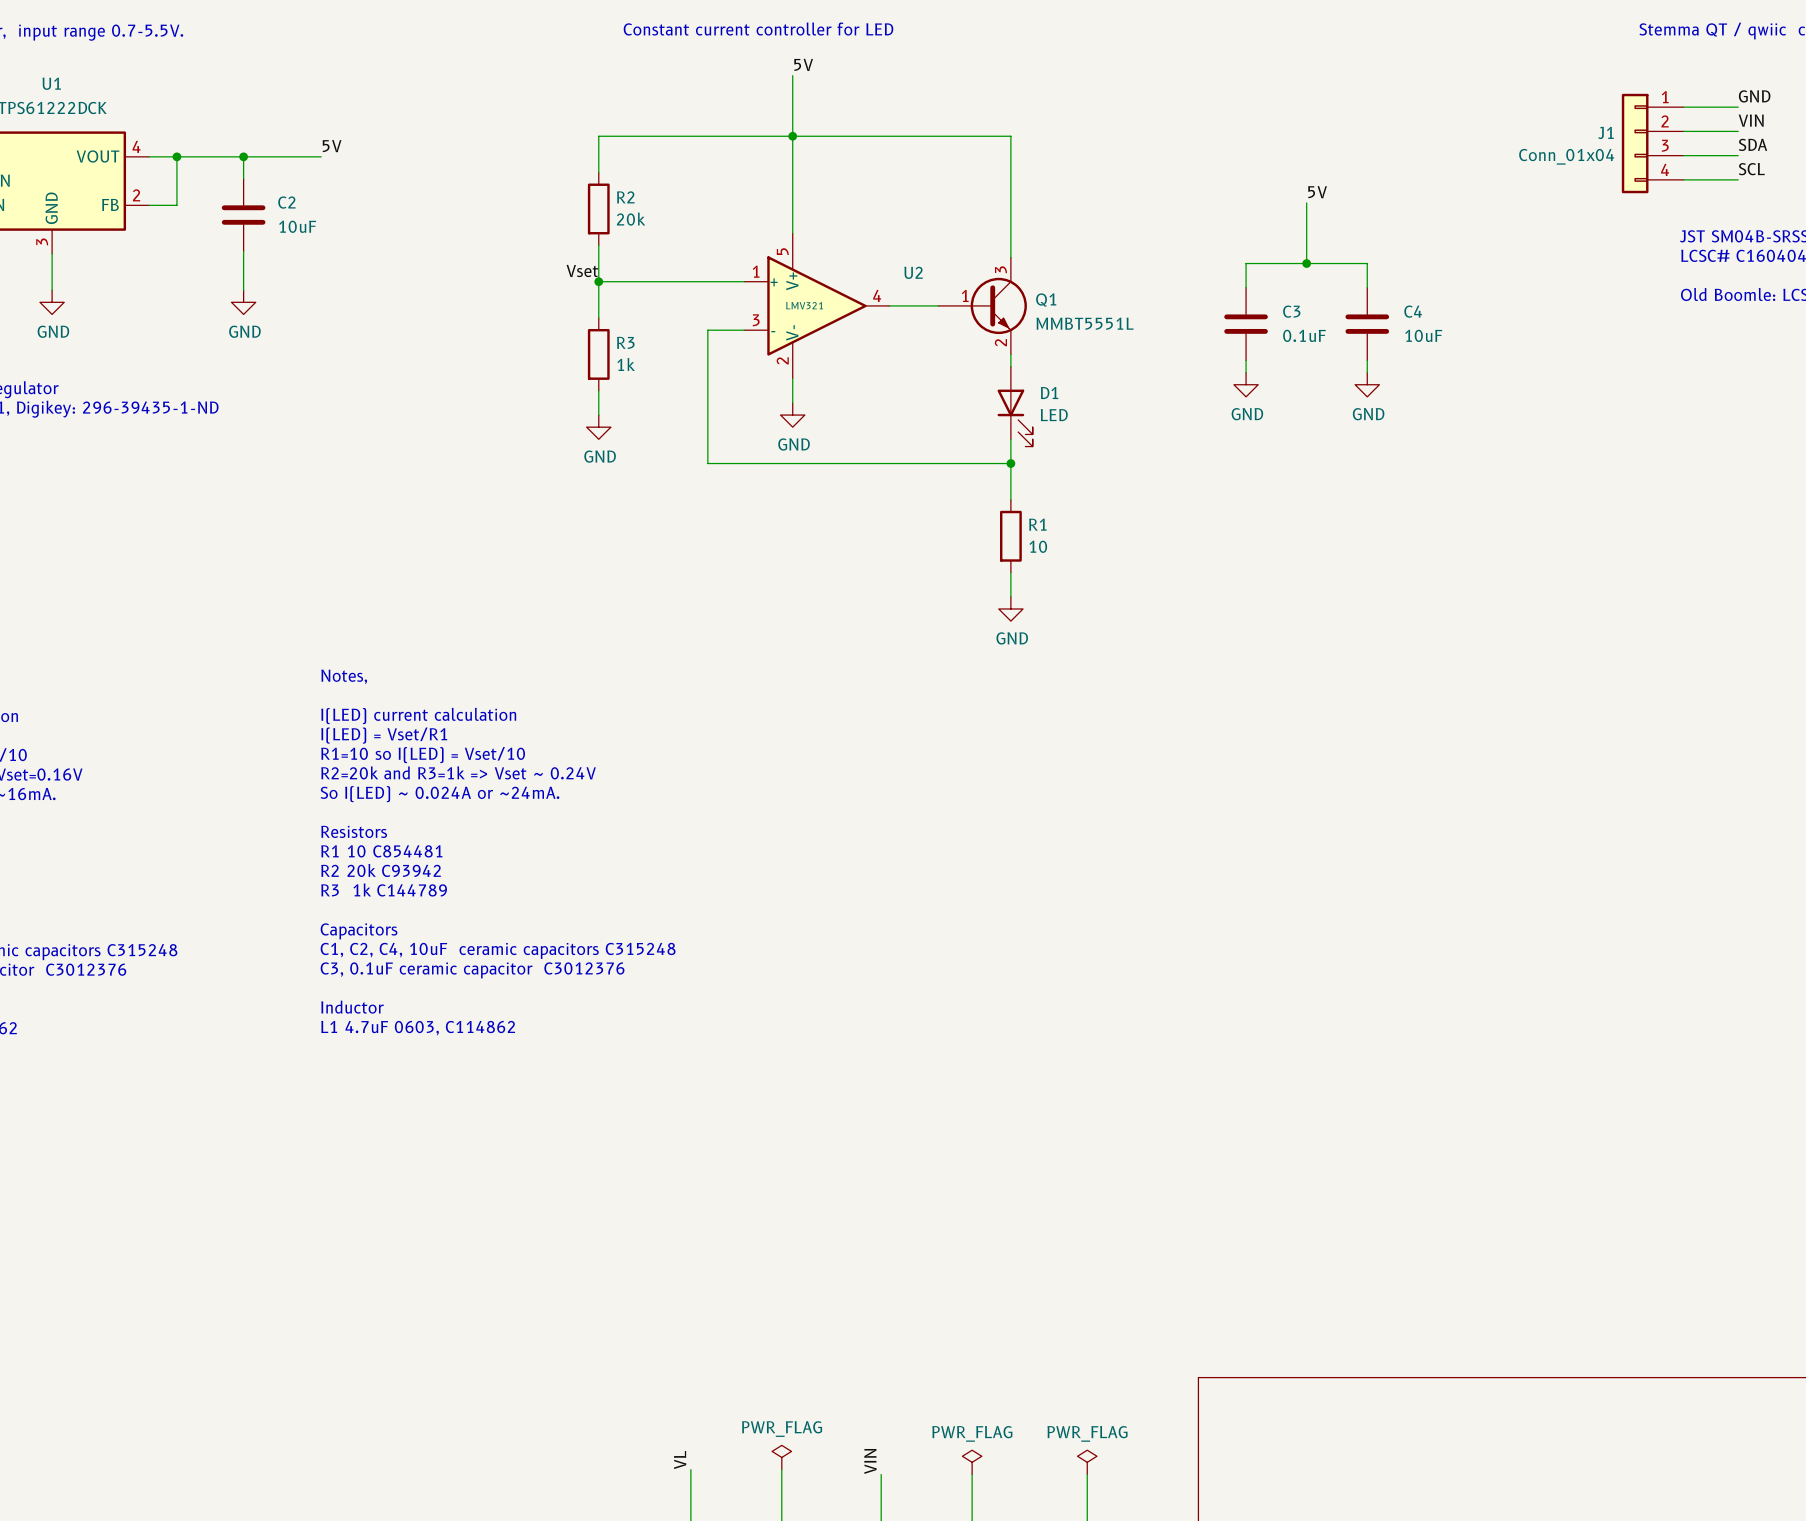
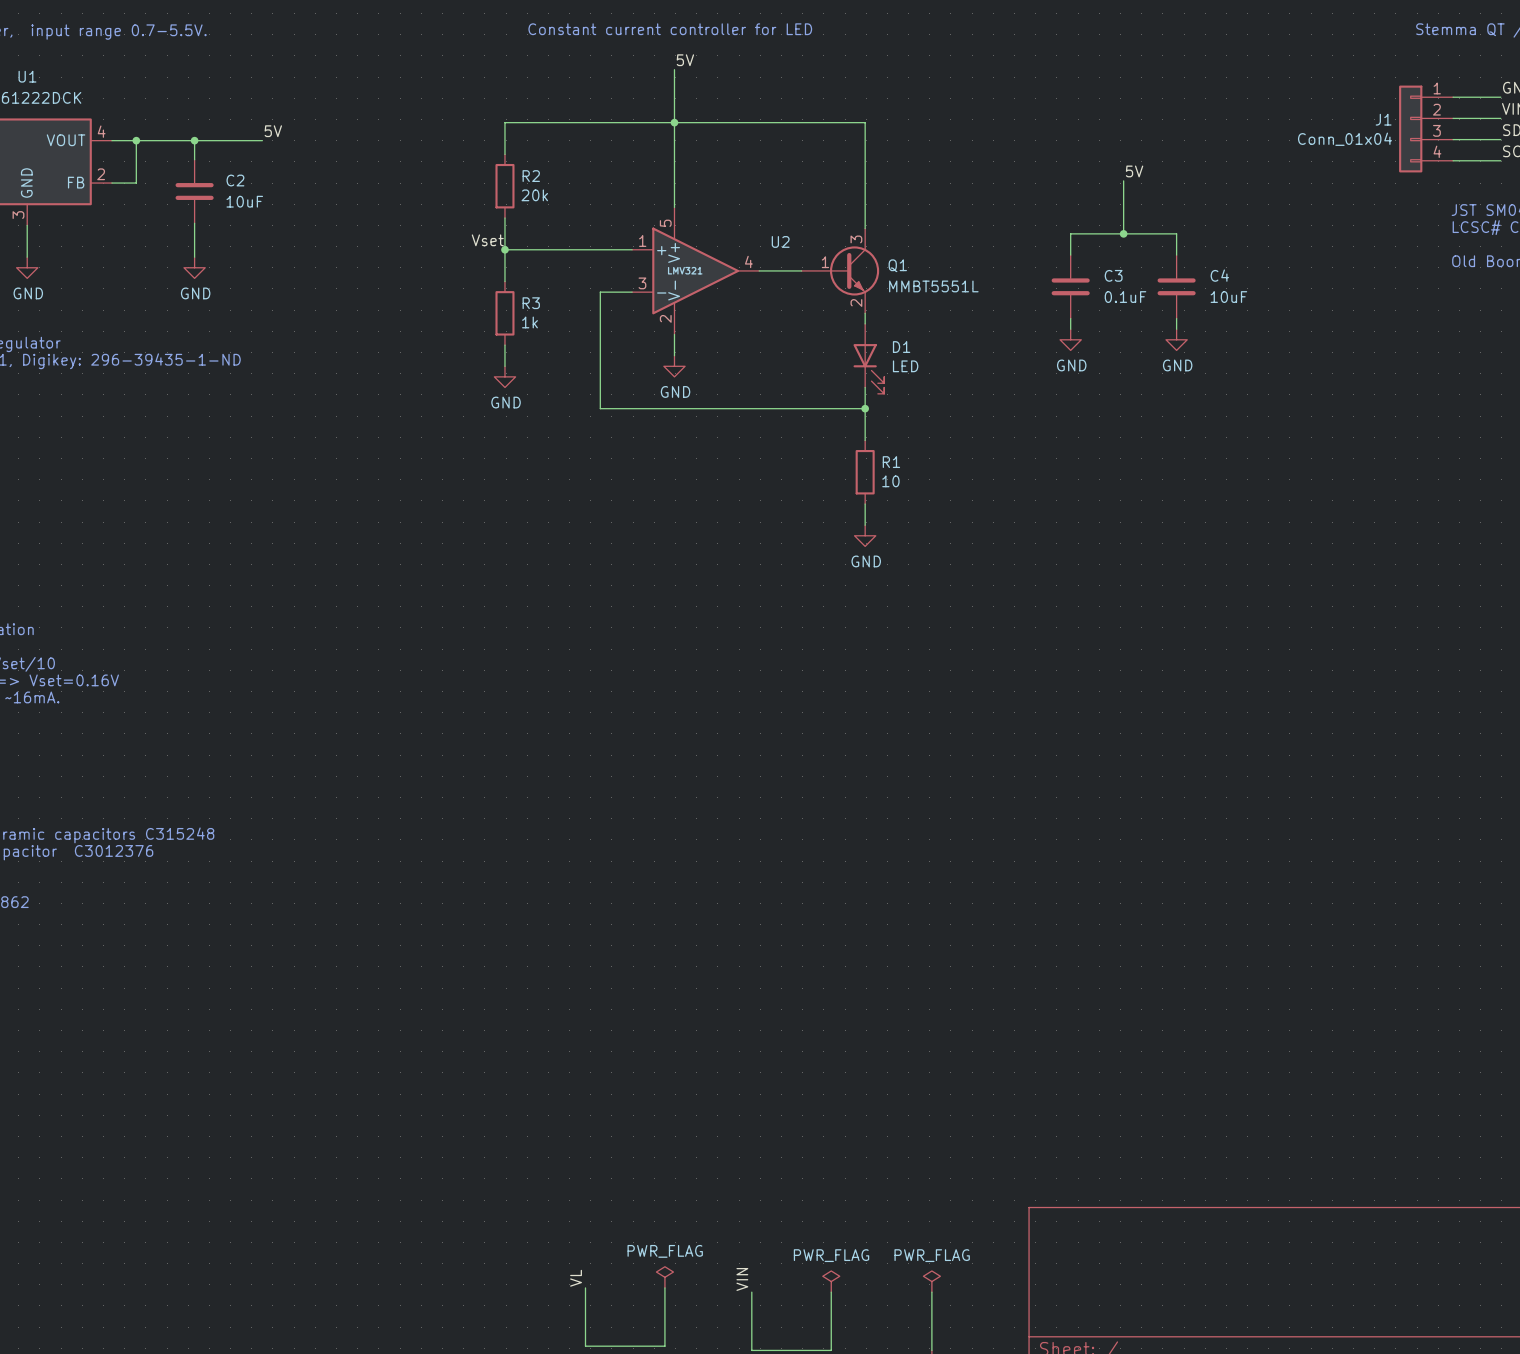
text: Notes, (344, 676) -> none
text: I(LED) current calculation (418, 715) -> none
text: I(LED) = Vset/R1 (384, 735) -> none
text: R1=10 so I(LED) = Vset/10 (423, 755) -> none
text: R2=20k and R3=1k => Vset ~ 0.24V (458, 772) -> none
text: So I(LED) ~ 0.024A or ~24mA. (439, 794) -> none
text: Resistors (354, 831) -> none
text: R1 10 C854481 (381, 851) -> none
text: R2 20k C93942 (381, 870) -> none
text: R3 1k C144789 (384, 890) -> none
text: Capacitors (359, 931) -> none
text: C1, C2, C4, 10uF ceramic capacitors C315248 (498, 950) -> none
text: C3, 0.1uF ceramic capacitor C3012376 (472, 970) -> none
text: Inductor (352, 1007) -> none
text: L1 4.7uF 0603, C114862 (418, 1028) -> none

